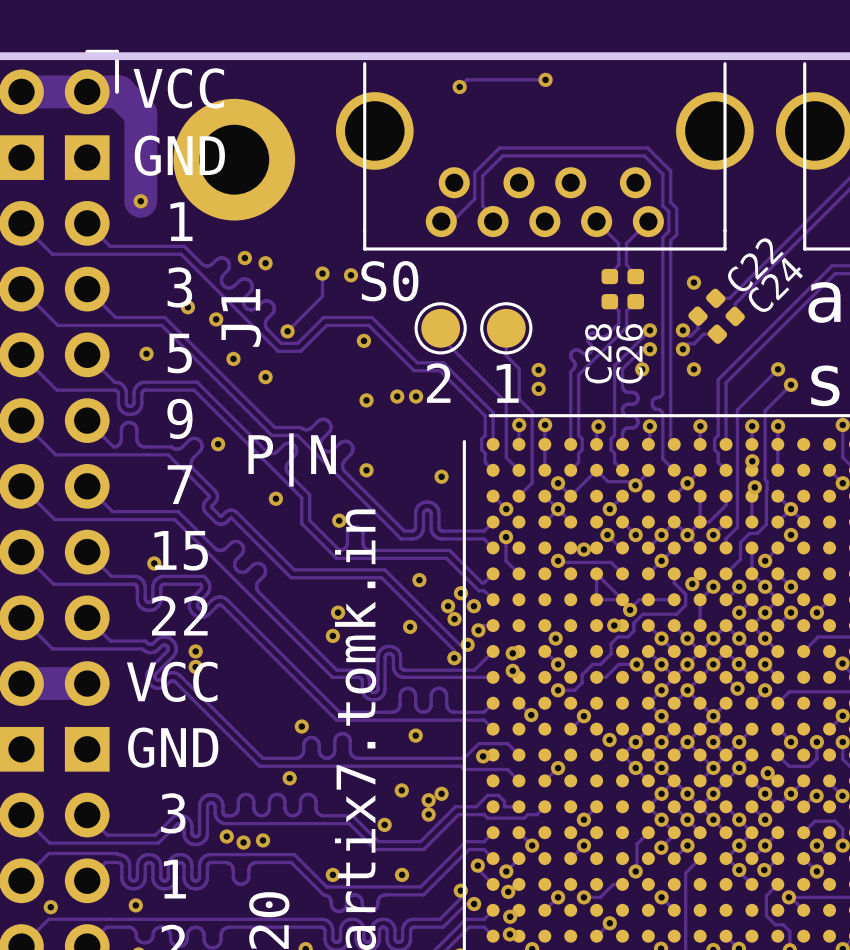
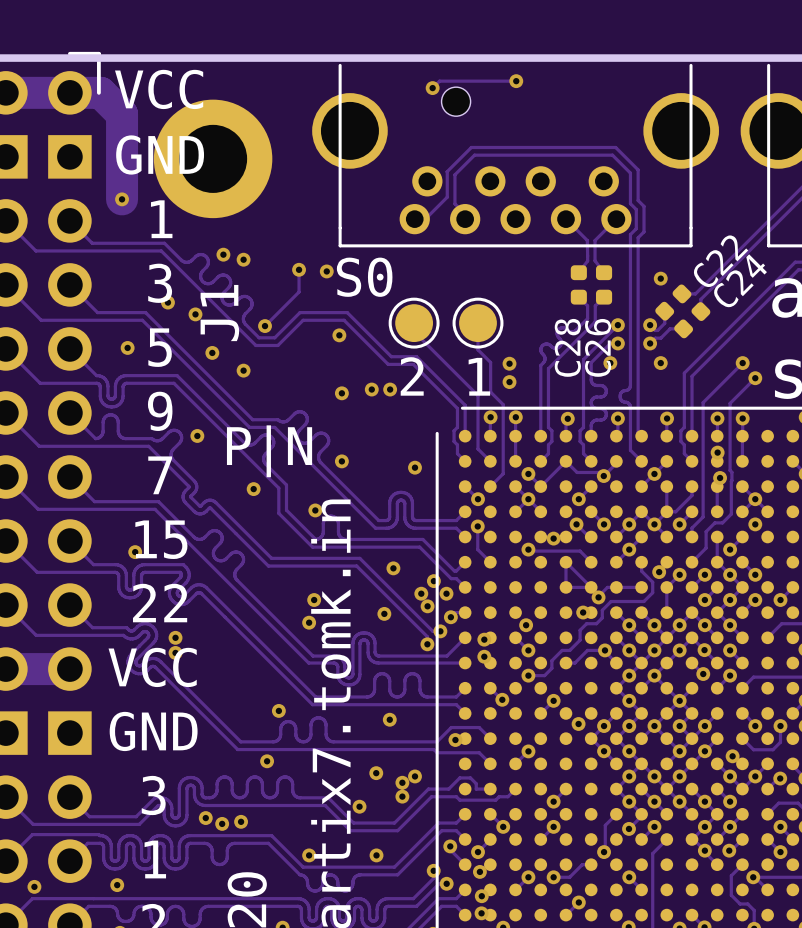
part: none -> (456, 101)

